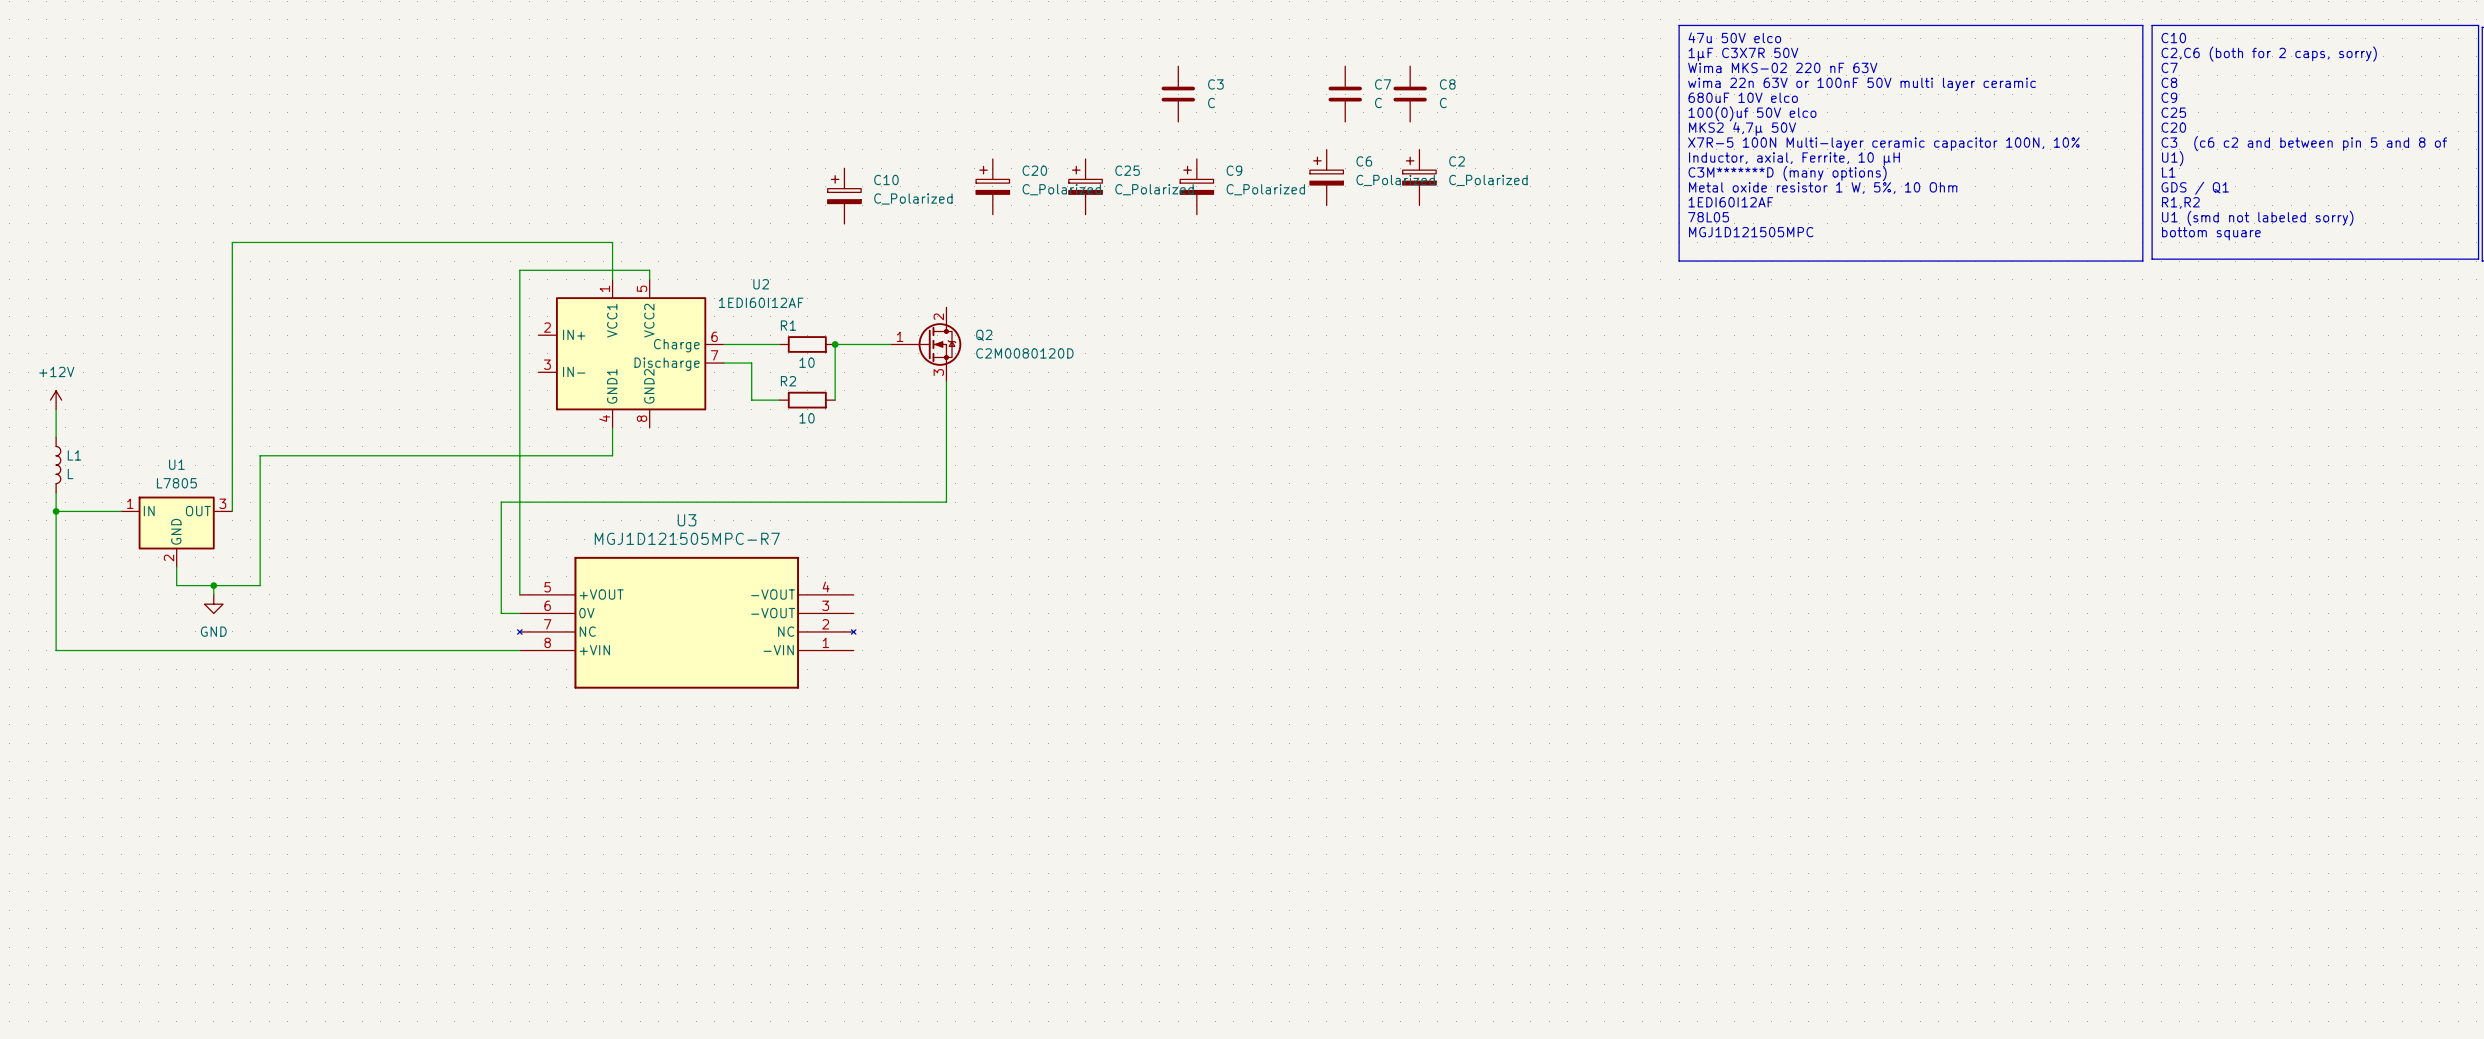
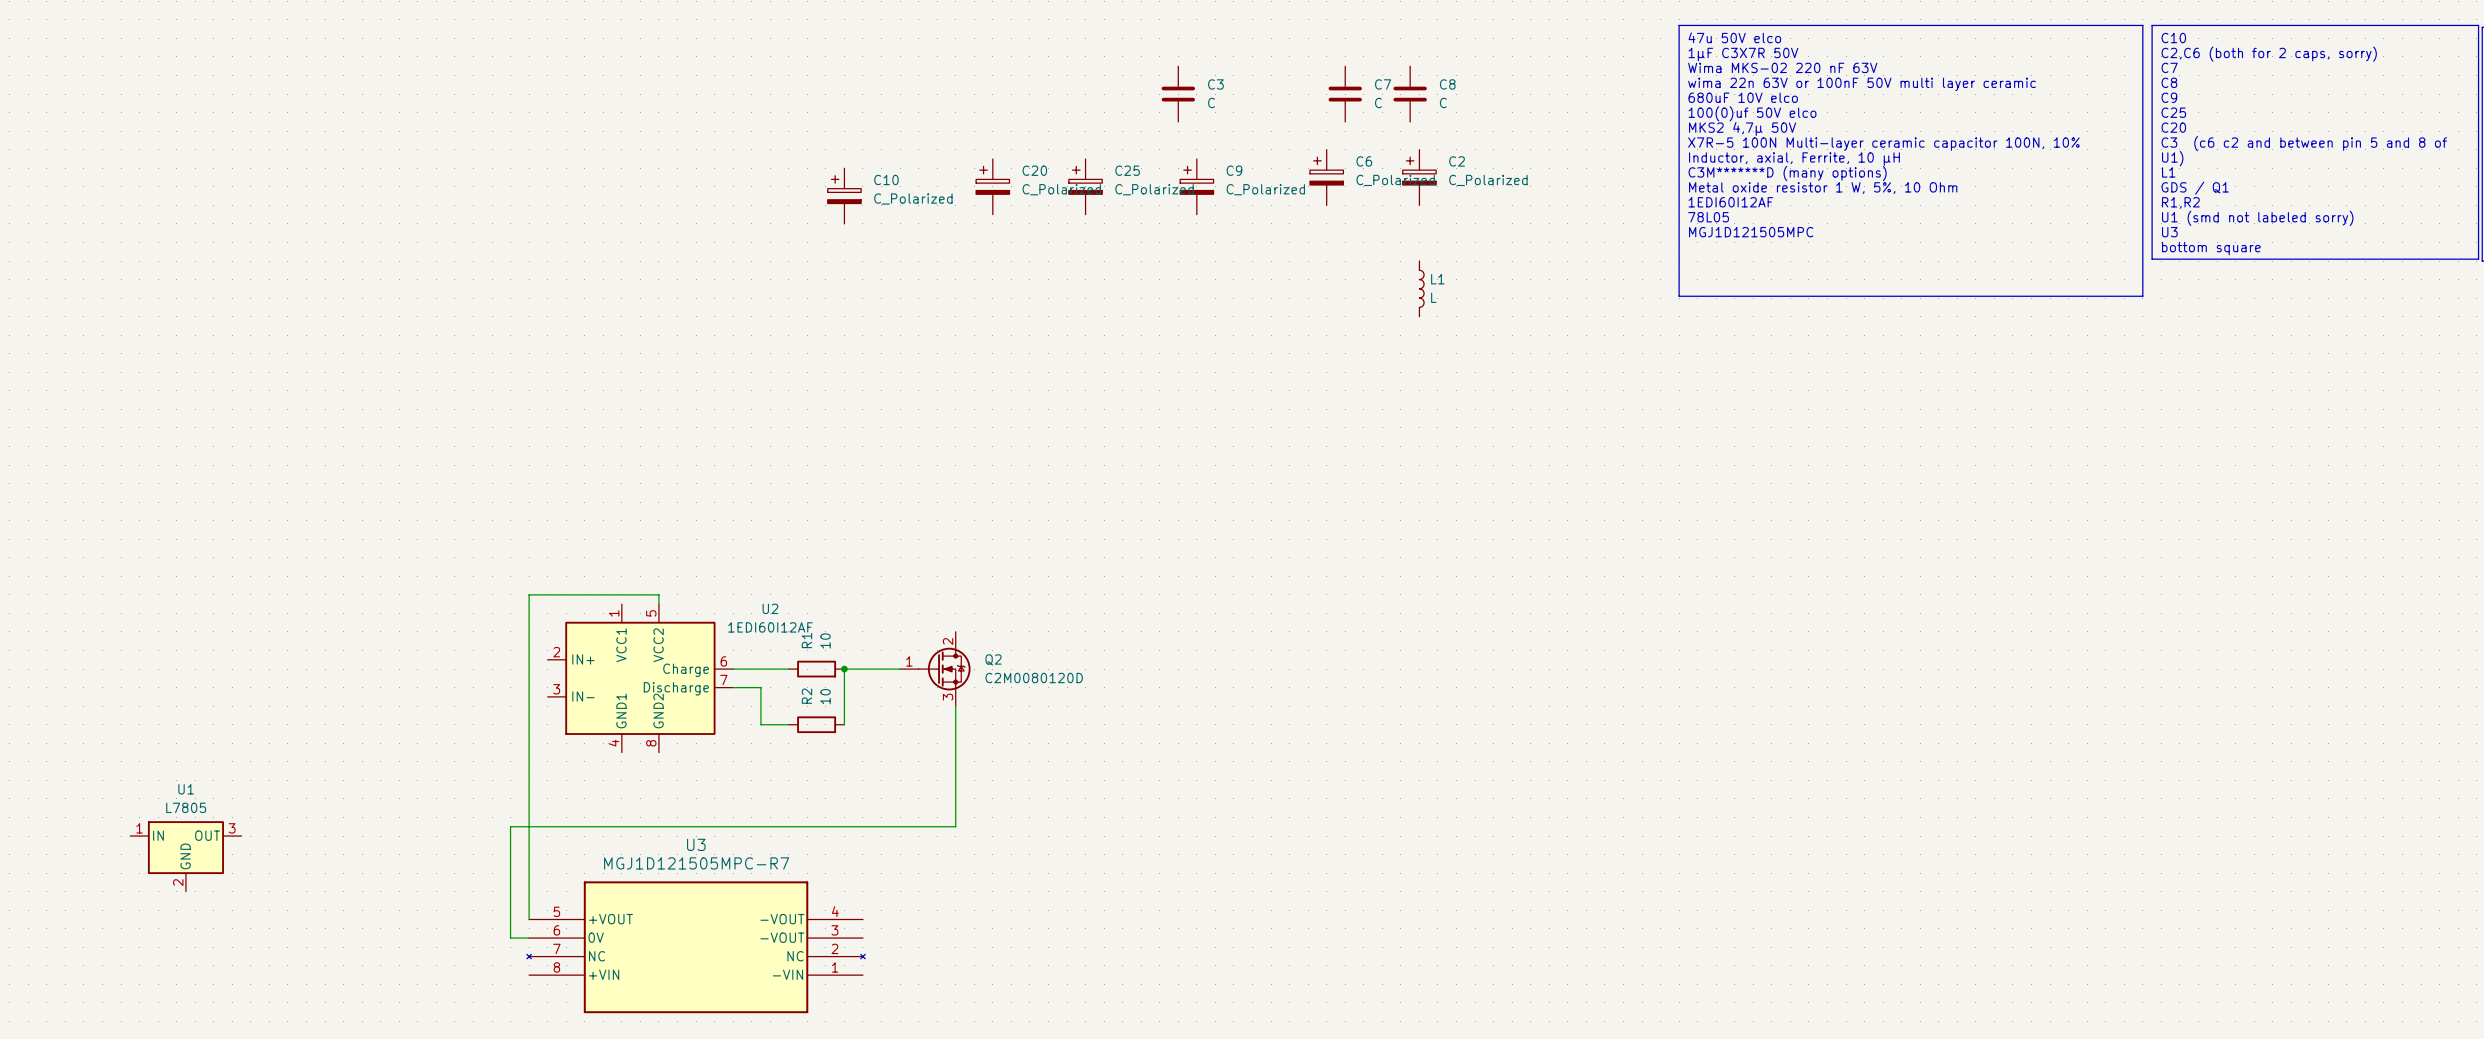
text: bottom square (2211, 233) -> U3 (2169, 232)
text: none -> bottom square (2211, 248)
line: (1679, 261) (2142, 261) -> (1679, 261) (1679, 296) (2142, 296) (2142, 261)
wire: (612, 279) (612, 242) (232, 242) (232, 511) -> none
wire: (649, 279) (649, 270) (519, 270) (519, 594) -> none
R1 name rotation: 0° (788, 325) -> 90° counterclockwise (806, 640)
wire: (723, 344) (779, 344) -> none
R1 position: (807, 344) -> (816, 669)
junction: (835, 344) -> none
wire: (890, 344) (835, 344) (835, 400) -> none
Q2 position: (926, 344) -> (935, 669)
U2 position: (631, 353) -> (640, 678)
R1 value rotation: 0° (807, 362) -> 90° counterclockwise (825, 640)
R1 value position: 10 (807, 362) -> 10 (825, 640)
wire: (723, 363) (751, 363) (751, 400) (779, 400) -> none
R2 name rotation: 0° (788, 381) -> 90° counterclockwise (806, 696)
wire: (946, 381) (946, 502) (501, 502) (501, 613) (519, 613) -> none
power symbol: +12V (56, 400) -> none
R2 position: (807, 400) -> (816, 724)
wire: (56, 409) (56, 437) -> none
R2 value rotation: 0° (807, 418) -> 90° counterclockwise (825, 696)
R2 value position: 10 (807, 418) -> 10 (825, 696)
wire: (612, 427) (612, 455) (260, 455) (260, 585) (176, 585) (176, 567) -> none
L1 position: (58, 465) -> (1421, 288)
wire: (56, 492) (56, 650) (519, 650) -> none
wire: (56, 511) (121, 511) -> none
junction: (56, 511) -> none
U1 position: (176, 531) -> (185, 856)
wire: (213, 585) (213, 594) -> none
junction: (213, 585) -> none
power symbol: GND (213, 604) -> none
wire: none -> (658, 604) (658, 594) (529, 594) (529, 919)
U3 position: (686, 622) -> (696, 947)
junction: none -> (844, 669)
wire: none -> (900, 669) (844, 669) (844, 724)
wire: none -> (733, 687) (760, 687) (760, 724) (788, 724)
wire: none -> (955, 706) (955, 826) (510, 826) (510, 938) (529, 938)

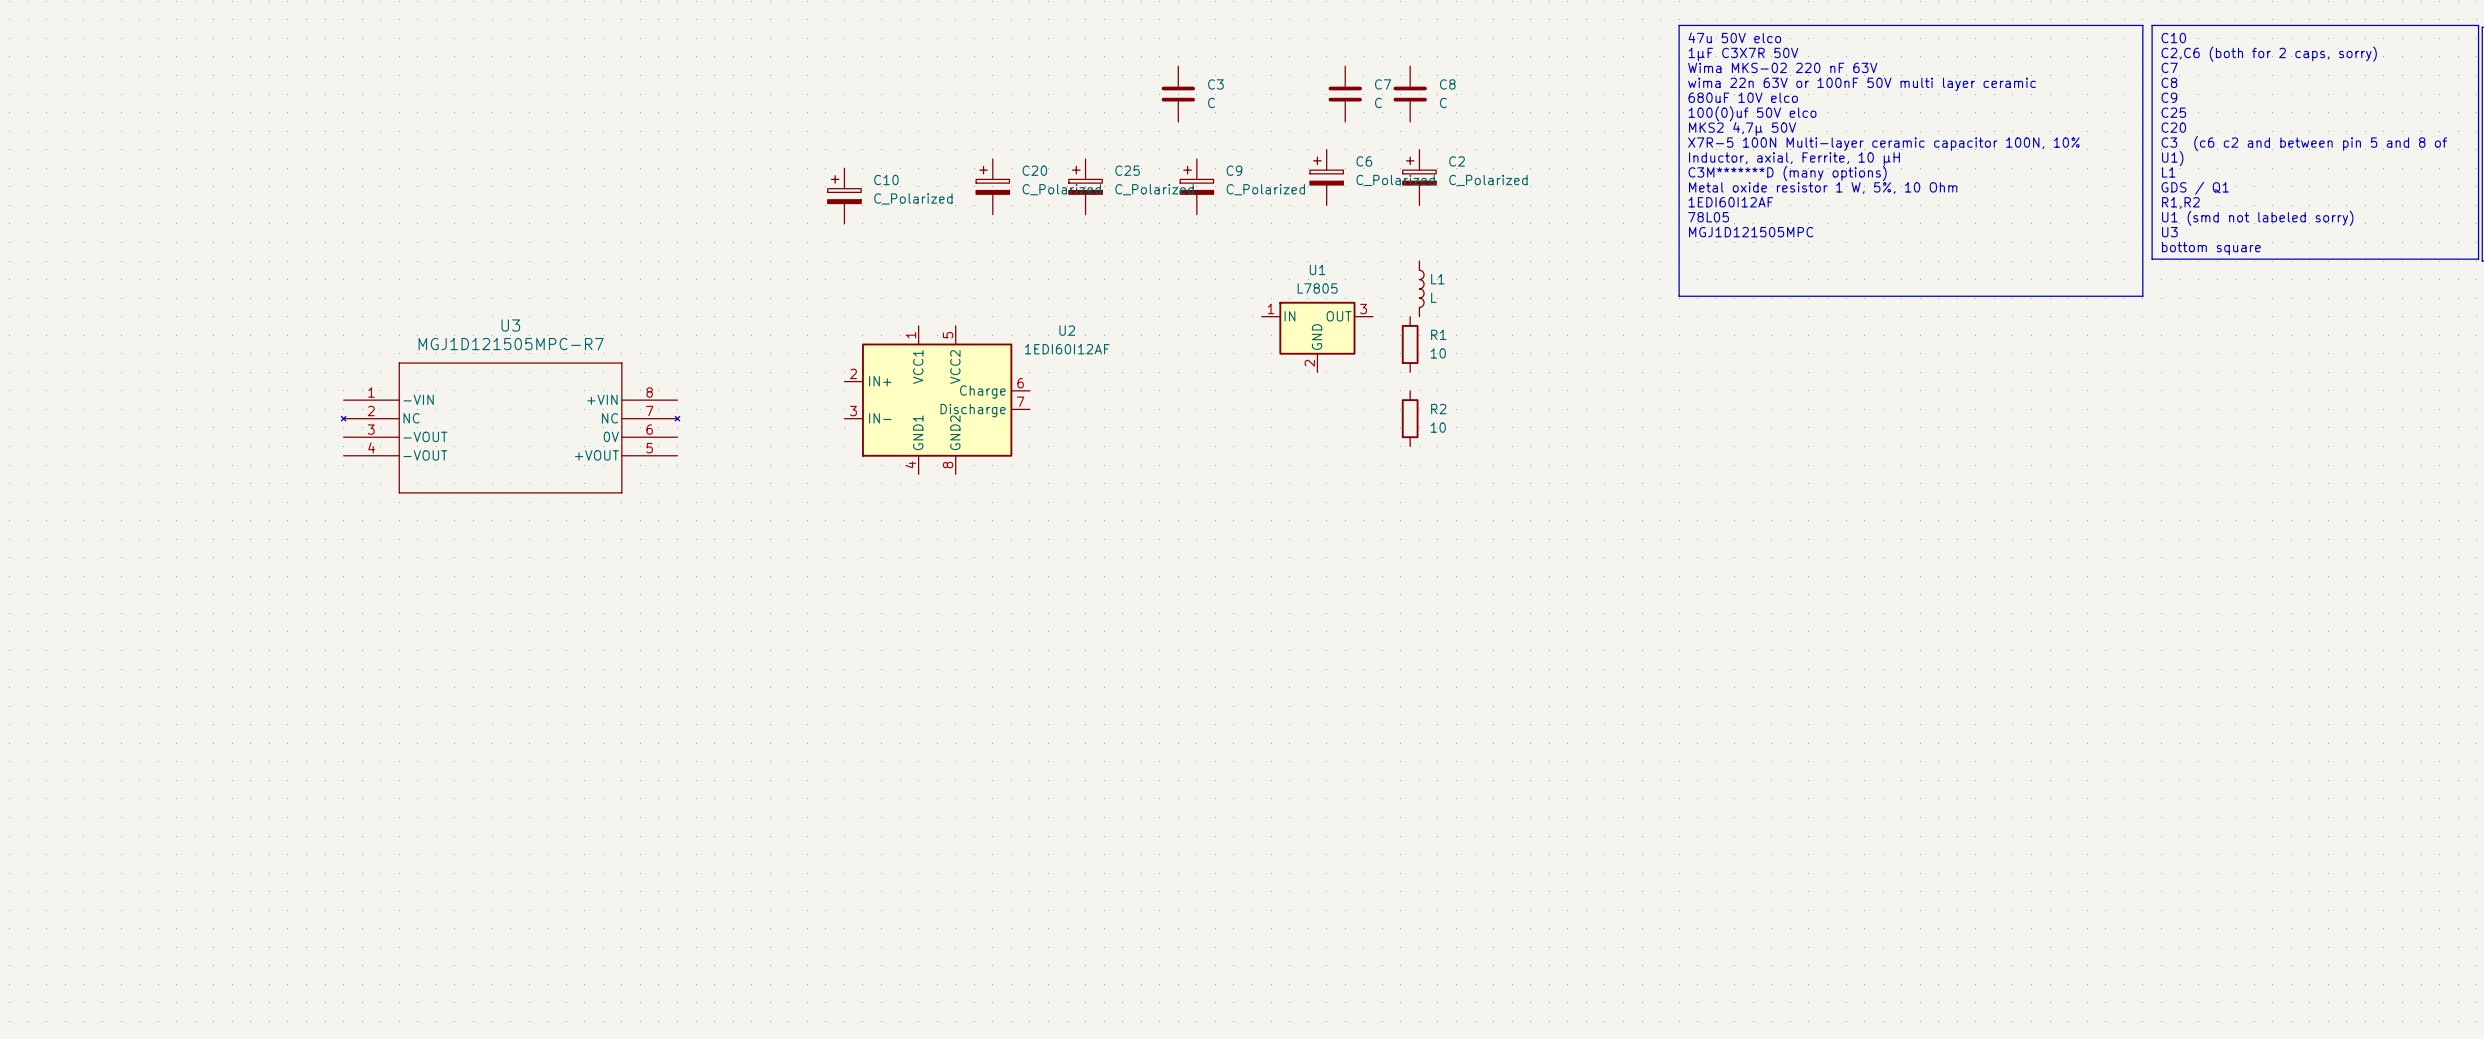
wire: (658, 604) (658, 594) (529, 594) (529, 919) -> none
wire: (733, 669) (788, 669) -> none
R1 rotation: 0° (816, 669) -> 90° clockwise (1410, 344)
R1 position: (816, 669) -> (1410, 344)
junction: (844, 669) -> none
wire: (900, 669) (844, 669) (844, 724) -> none
Q2: C2M0080120D (935, 669) -> none
U2 position: (640, 678) -> (937, 400)
wire: (733, 687) (760, 687) (760, 724) (788, 724) -> none
wire: (955, 706) (955, 826) (510, 826) (510, 938) (529, 938) -> none
R2 rotation: 0° (816, 724) -> 90° clockwise (1410, 418)
R2 position: (816, 724) -> (1410, 418)
U1 position: (185, 856) -> (1317, 337)
U3 symbol: [526, 881, 866, 1014] -> [341, 362, 680, 494]

